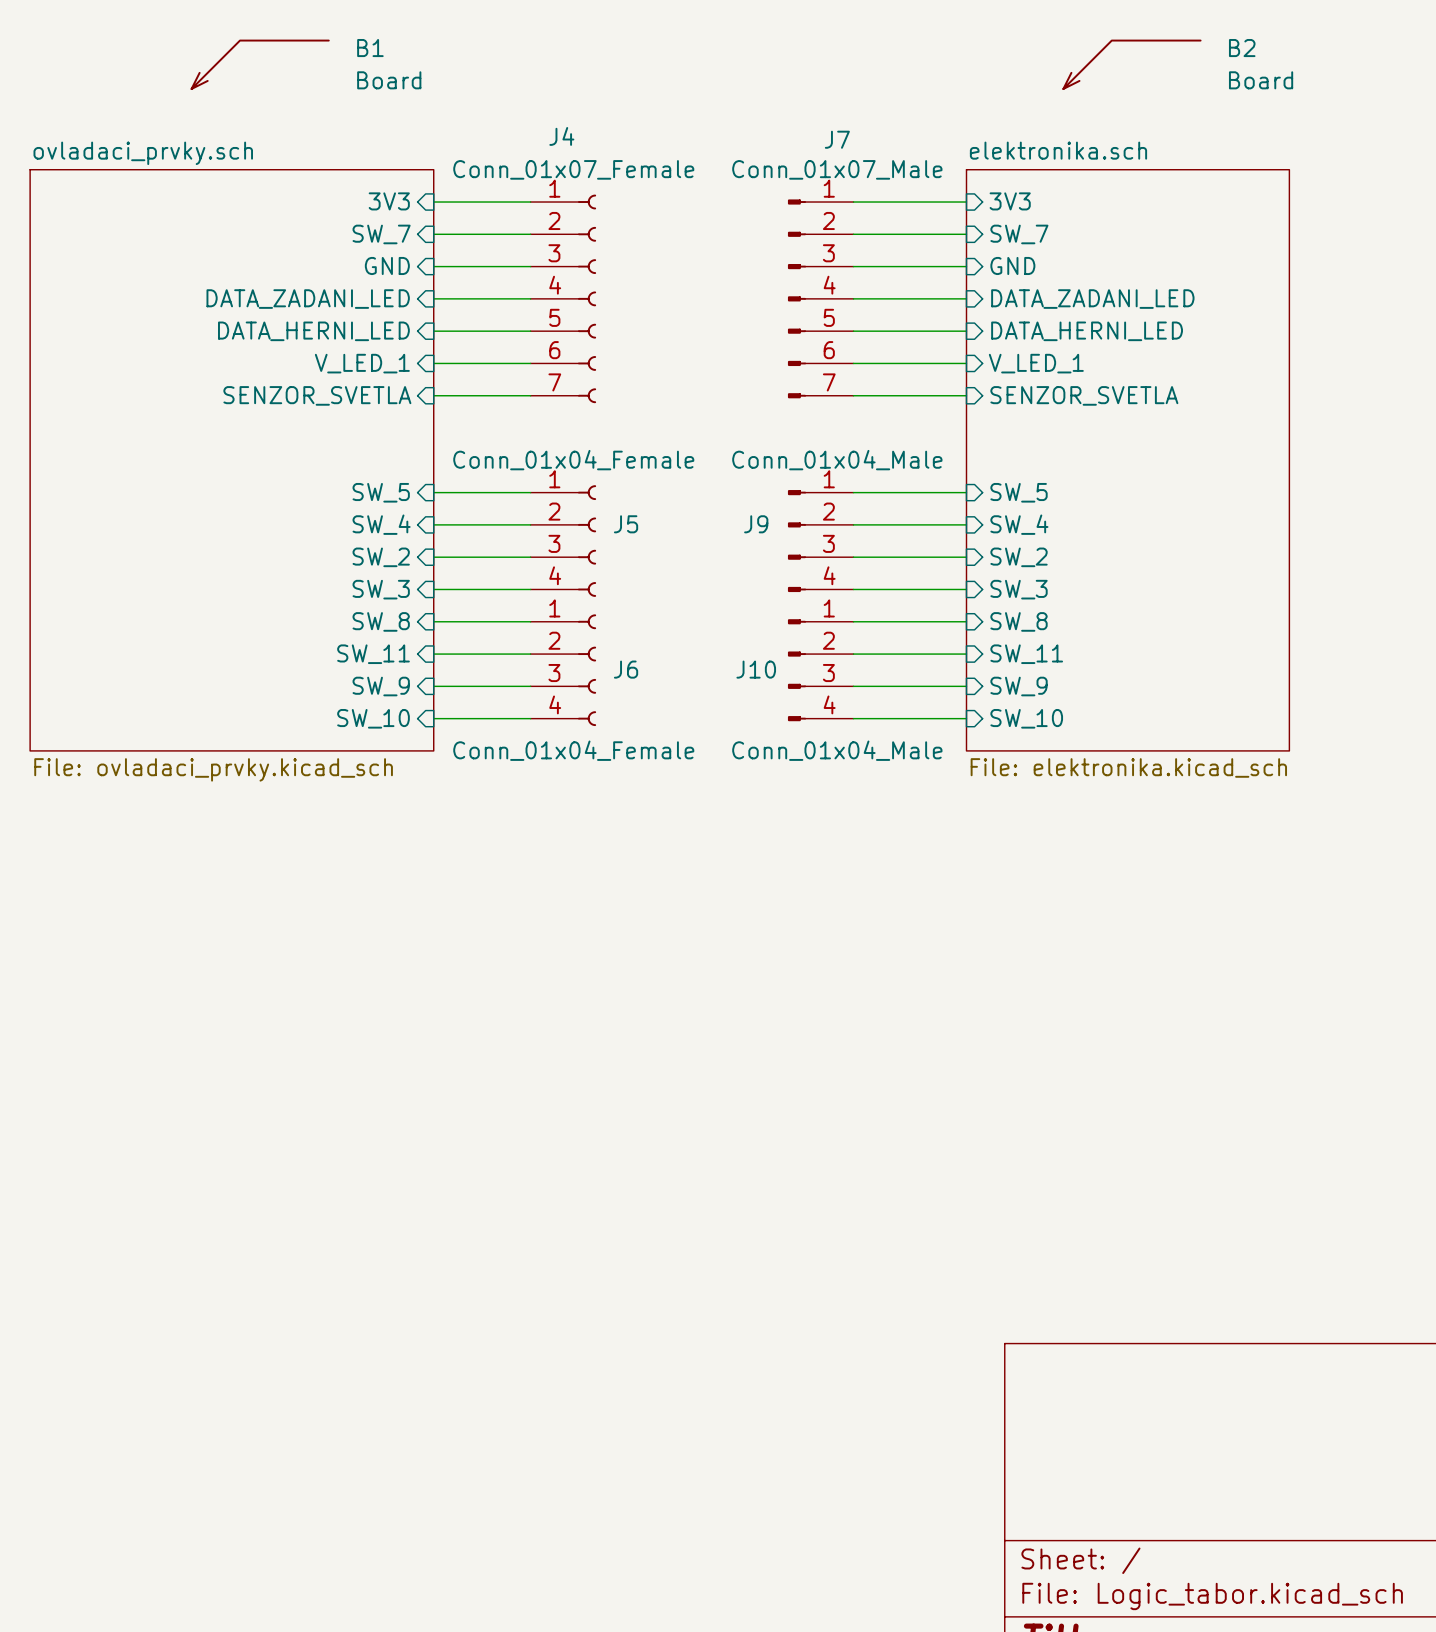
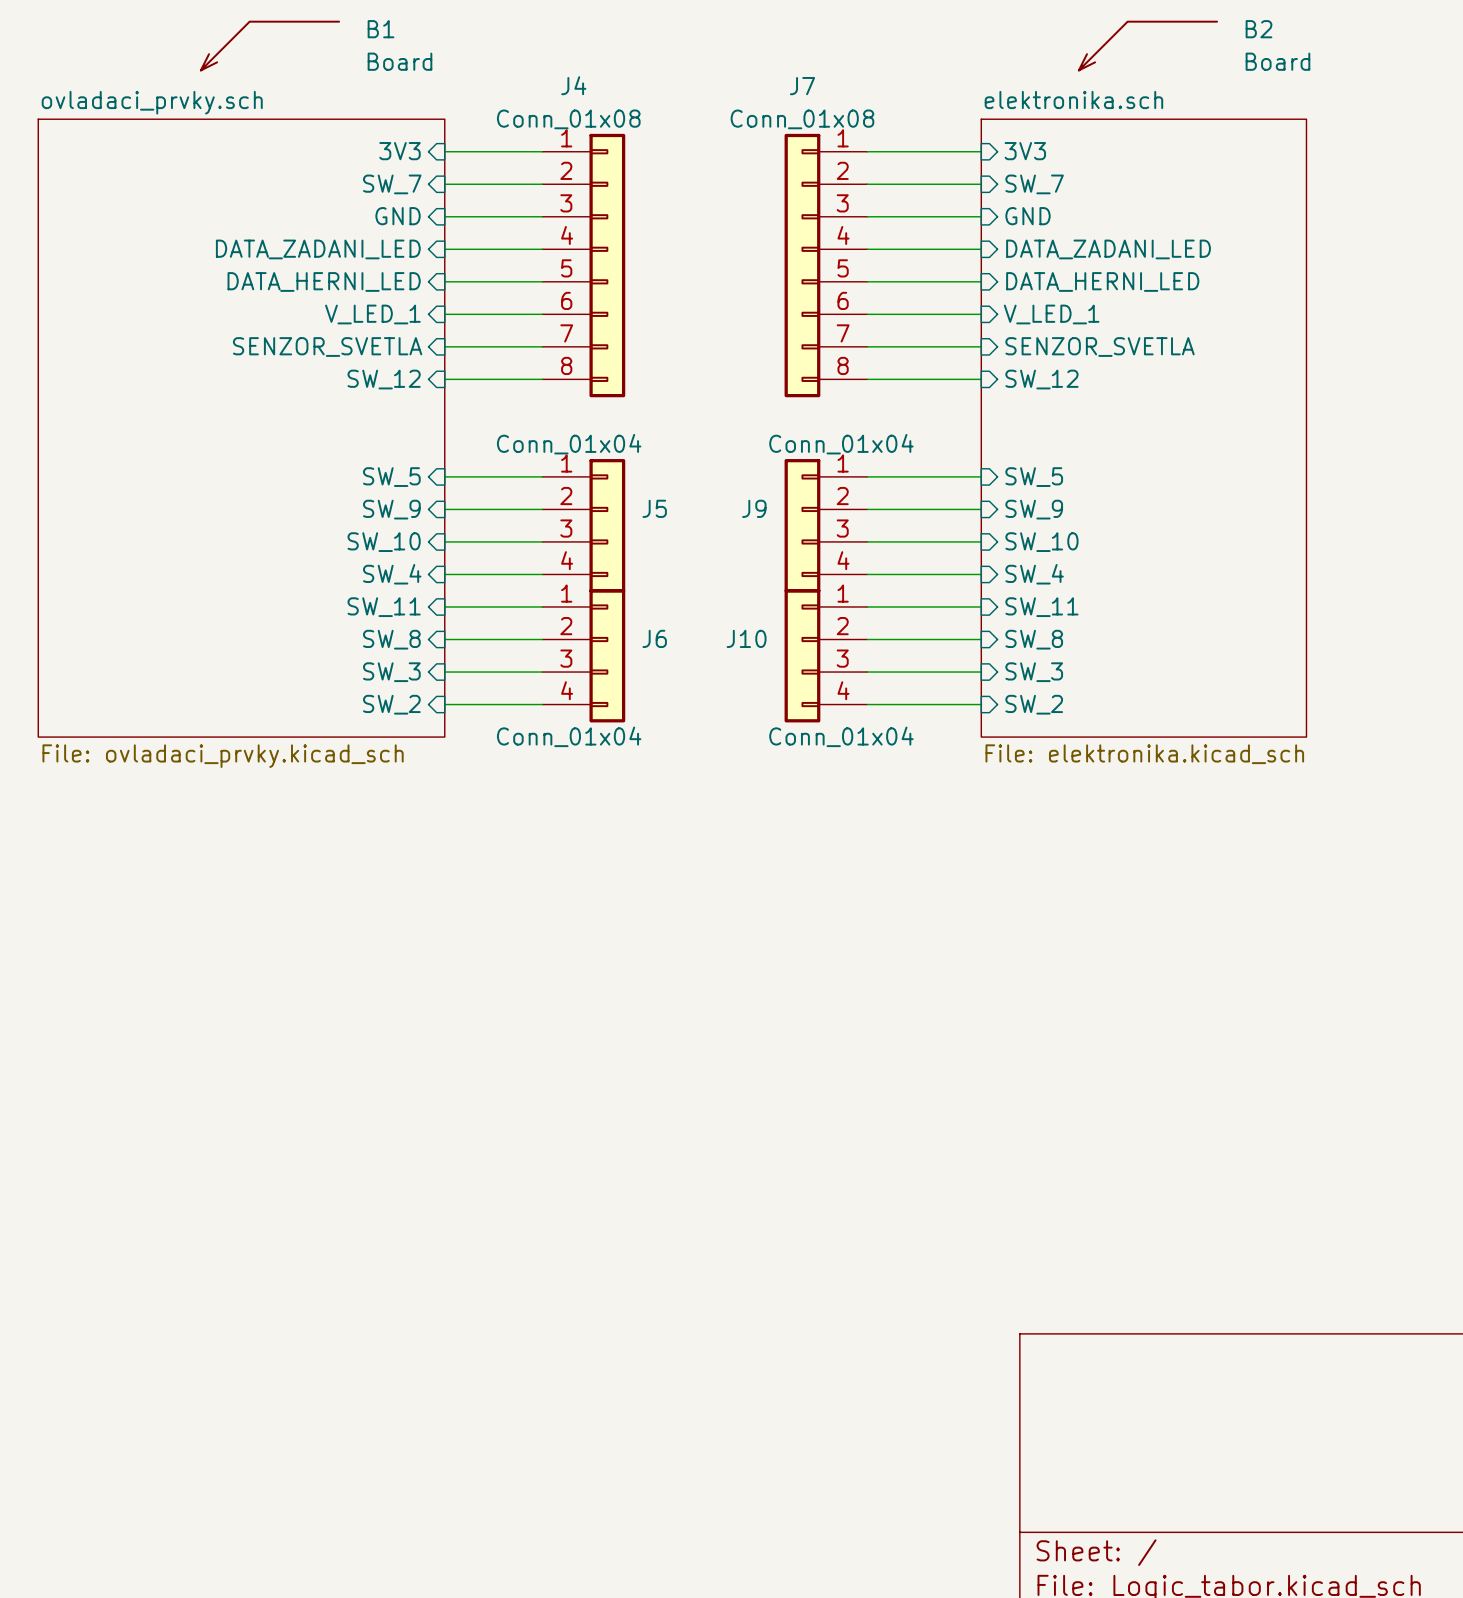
J7 name position: J7 (837, 139) -> J7 (802, 86)
sheet pin: none -> 3V3 (399, 151)
wire: none -> (444, 151) (542, 151)
J4 value: Conn_01x07_Female (573, 169) -> Conn_01x08 (568, 119)
J7 value: Conn_01x07_Male (837, 169) -> Conn_01x08 (802, 119)
wire: none -> (867, 151) (981, 151)
sheet pin: none -> 3V3 (1025, 151)
J4 symbol: [530, 194, 597, 404] -> [542, 133, 626, 398]
J7 symbol: [787, 199, 854, 399] -> [784, 133, 868, 398]
sheet pin: 3V3 (389, 201) -> SW_7 (392, 184)
sheet pin: 3V3 (1010, 201) -> SW_7 (1034, 184)
sheet pin: SW_7 (381, 234) -> GND (398, 216)
sheet pin: SW_7 (1019, 234) -> GND (1028, 216)
sheet pin: GND (387, 265) -> DATA_ZADANI_LED (318, 249)
sheet pin: GND (1012, 265) -> DATA_ZADANI_LED (1108, 249)
sheet pin: DATA_ZADANI_LED (308, 299) -> DATA_HERNI_LED (324, 281)
sheet pin: DATA_ZADANI_LED (1092, 299) -> DATA_HERNI_LED (1102, 281)
sheet pin: DATA_HERNI_LED (313, 331) -> V_LED_1 (372, 314)
sheet pin: DATA_HERNI_LED (1087, 331) -> V_LED_1 (1051, 314)
sheet pin: V_LED_1 (362, 363) -> SENZOR_SVETLA (327, 347)
sheet pin: V_LED_1 (1036, 363) -> SENZOR_SVETLA (1100, 347)
sheet pin: SENZOR_SVETLA (317, 395) -> SW_12 (384, 379)
sheet pin: SENZOR_SVETLA (1084, 395) -> SW_12 (1041, 379)
sheet ovladaci_prvky.sch: none -> File: ovladaci_prvky.kicad_sch (241, 428)
sheet elektronika.sch: none -> File: elektronika.kicad_sch (1143, 428)
sheet ovladaci_prvky.sch: File: ovladaci_prvky.kicad_sch (231, 460) -> none
J5 value: Conn_01x04_Female (573, 460) -> Conn_01x04 (569, 444)
J9 value: Conn_01x04_Male (837, 460) -> Conn_01x04 (841, 444)
sheet elektronika.sch: File: elektronika.kicad_sch (1127, 460) -> none
J5 symbol: [530, 485, 597, 597] -> [542, 459, 626, 593]
J9 symbol: [787, 490, 854, 593] -> [784, 459, 868, 593]
sheet pin: SW_4 (381, 524) -> SW_9 (391, 509)
sheet pin: SW_4 (1019, 524) -> SW_9 (1034, 509)
sheet pin: SW_2 (381, 557) -> SW_10 (384, 542)
sheet pin: SW_2 (1019, 557) -> SW_10 (1041, 542)
sheet pin: SW_3 (381, 589) -> SW_4 (392, 574)
sheet pin: SW_3 (1019, 589) -> SW_4 (1034, 574)
J6 symbol: [530, 614, 597, 727] -> [542, 589, 626, 723]
J10 symbol: [787, 619, 854, 722] -> [784, 589, 868, 723]
sheet pin: SW_8 (381, 621) -> SW_11 (384, 607)
sheet pin: SW_8 (1019, 621) -> SW_11 (1041, 607)
sheet pin: SW_11 (373, 654) -> SW_8 (391, 639)
sheet pin: SW_11 (1026, 654) -> SW_8 (1034, 639)
sheet pin: SW_9 (381, 686) -> SW_3 (391, 672)
sheet pin: SW_9 (1019, 686) -> SW_3 (1034, 672)
sheet pin: SW_10 (373, 718) -> SW_2 (391, 704)
sheet pin: SW_10 (1026, 718) -> SW_2 (1034, 704)
J6 value: Conn_01x04_Female (573, 750) -> Conn_01x04 (569, 736)
J10 value: Conn_01x04_Male (837, 750) -> Conn_01x04 (841, 736)

